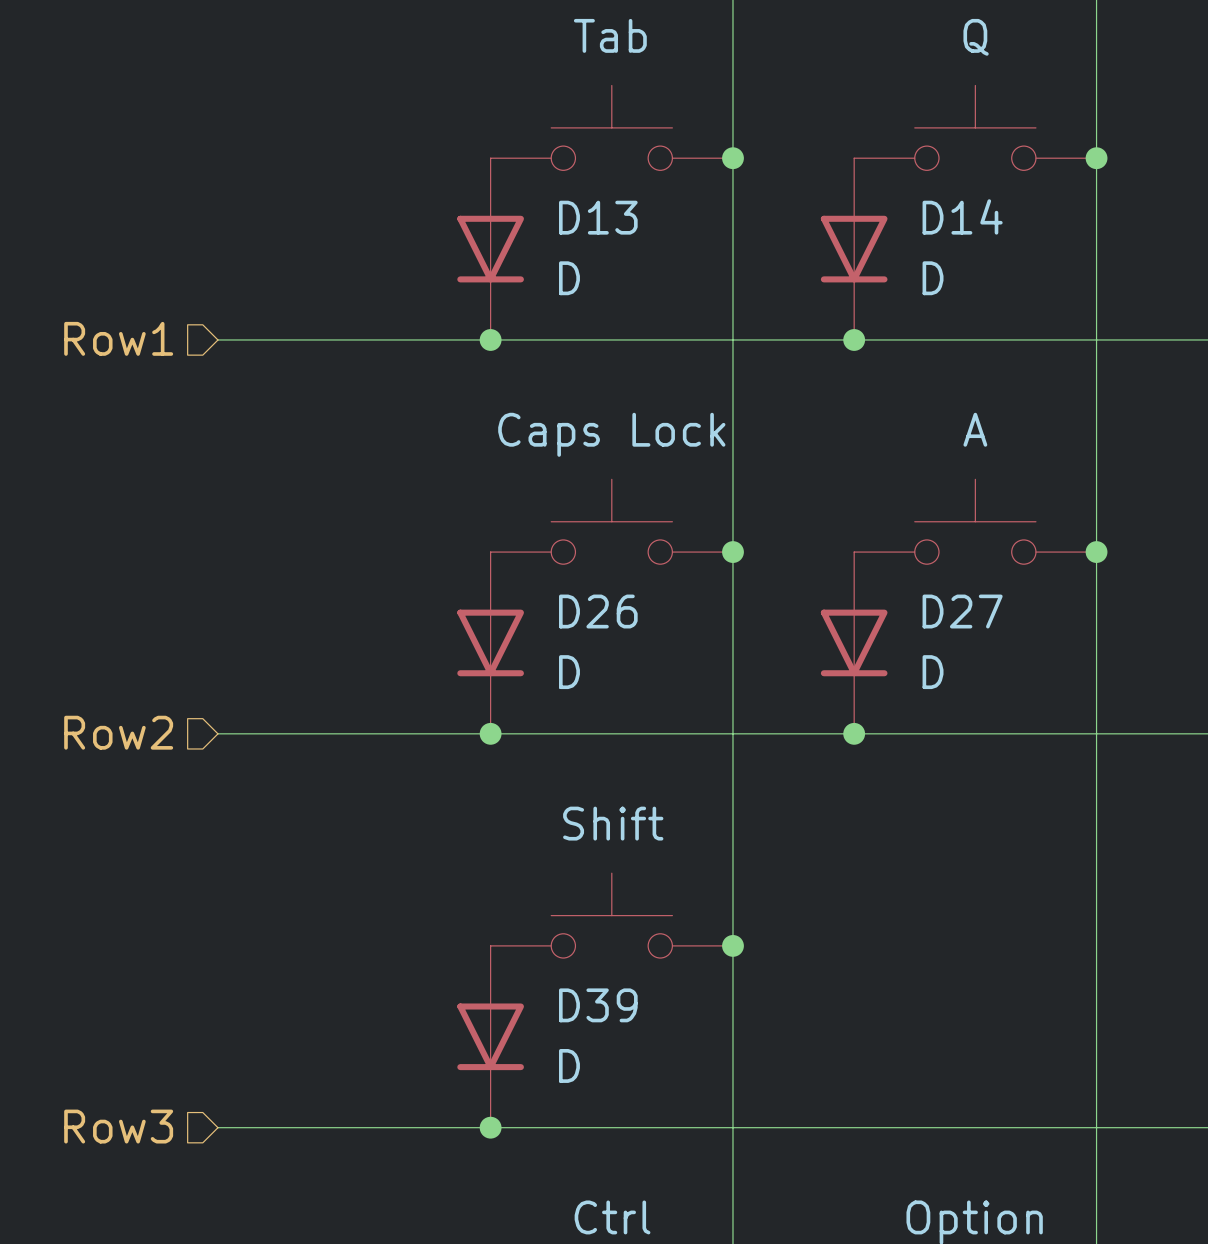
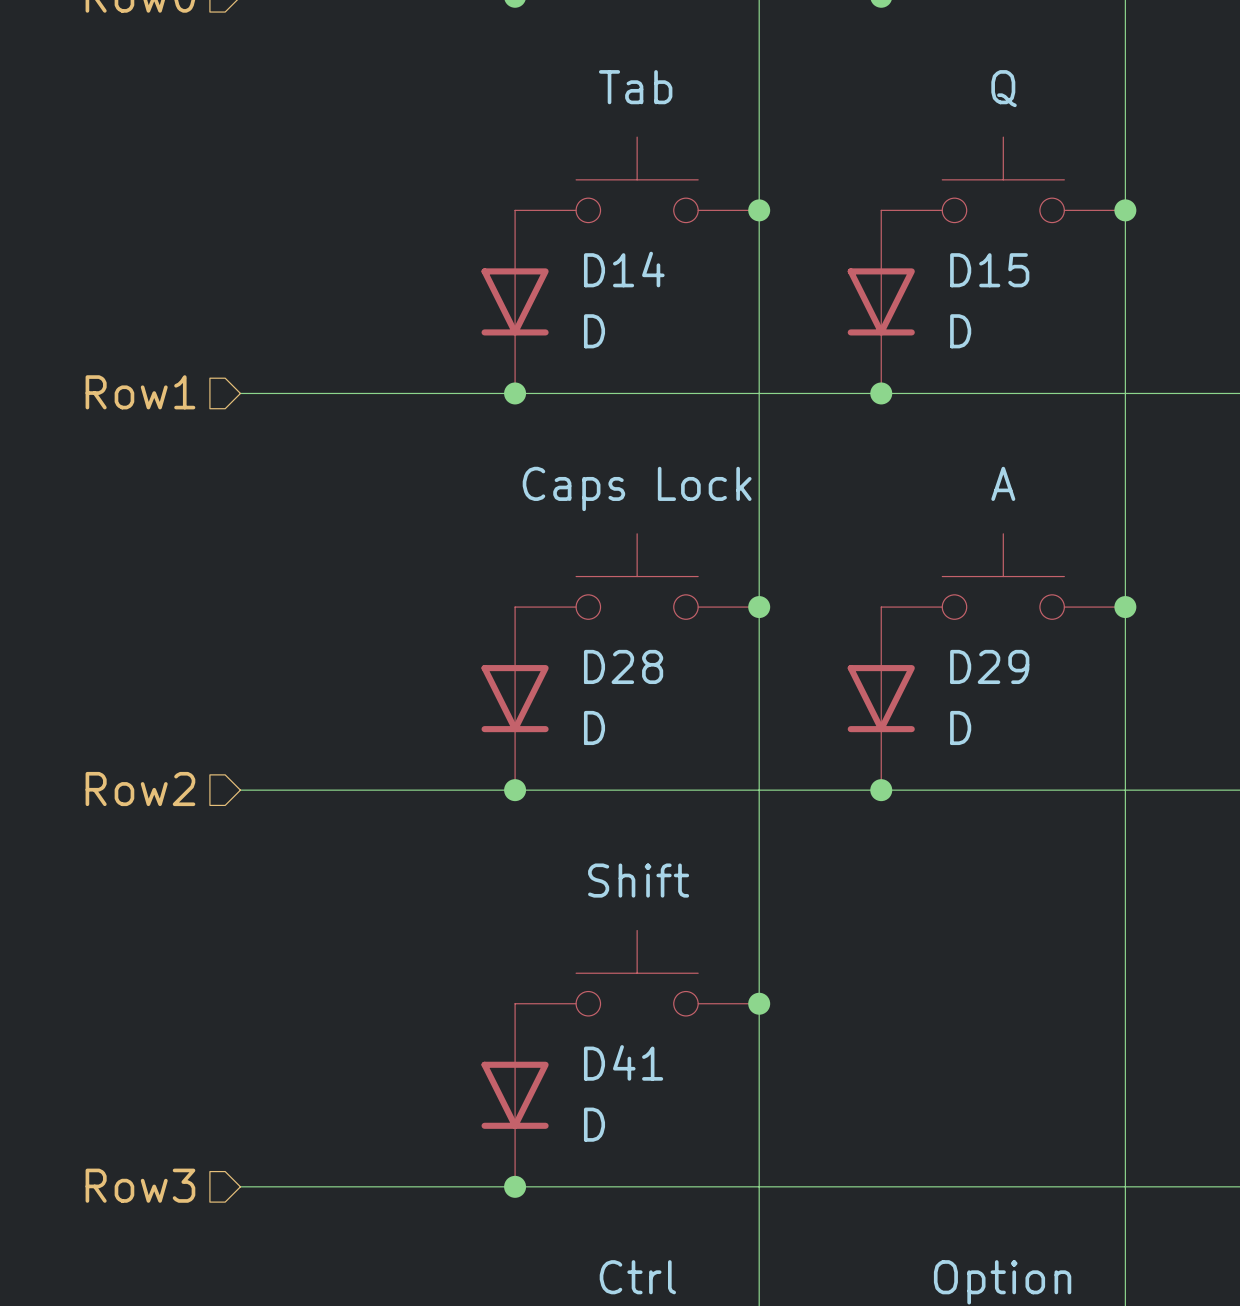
D14 name: D14 (962, 216) -> D15 (989, 270)
D13 name: D13 (598, 217) -> D14 (624, 269)
D26 name: D26 (598, 611) -> D28 (623, 666)
D27 name: D27 (962, 611) -> D29 (989, 666)
D39 name: D39 (598, 1005) -> D41 (623, 1062)

